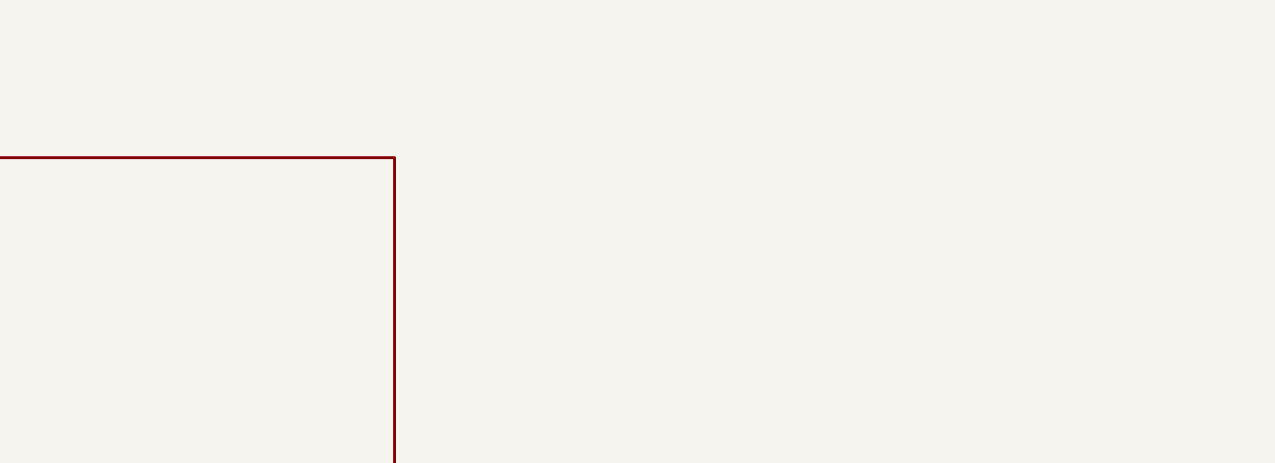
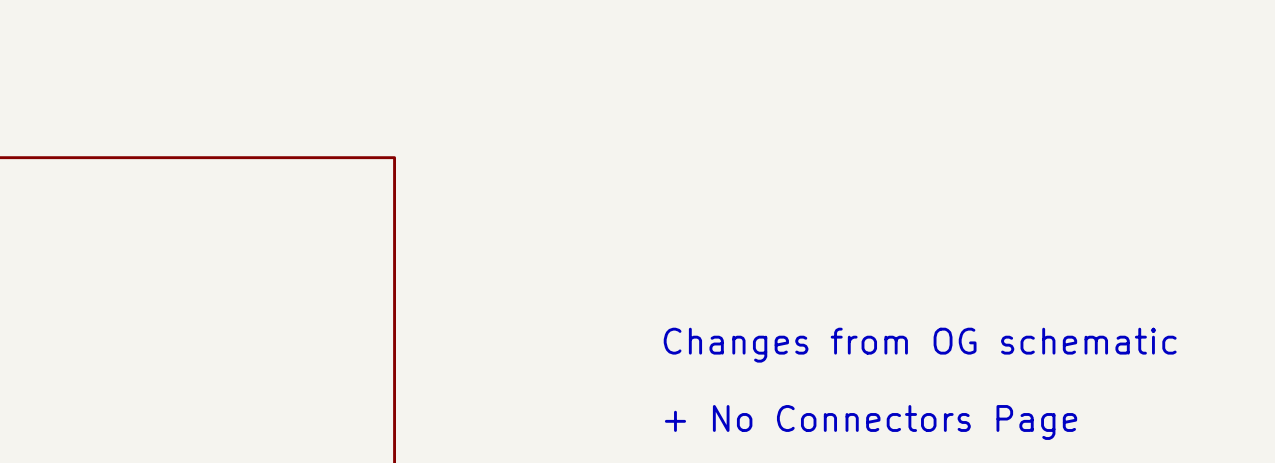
text: none -> Changes from OG schematic (920, 345)
text: none -> + No Connectors Page (871, 422)

